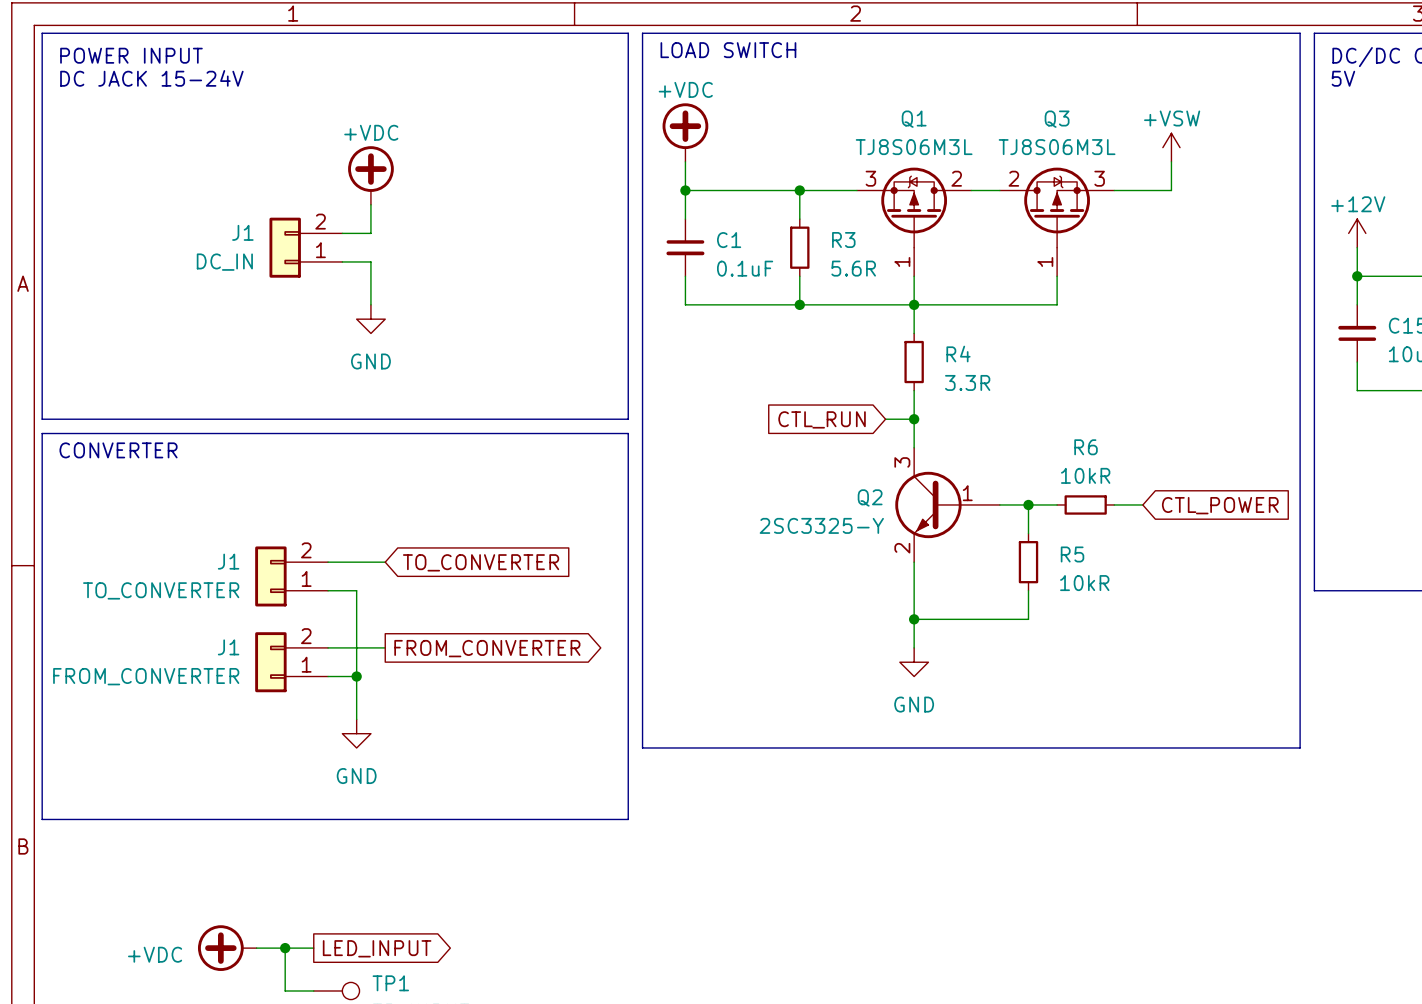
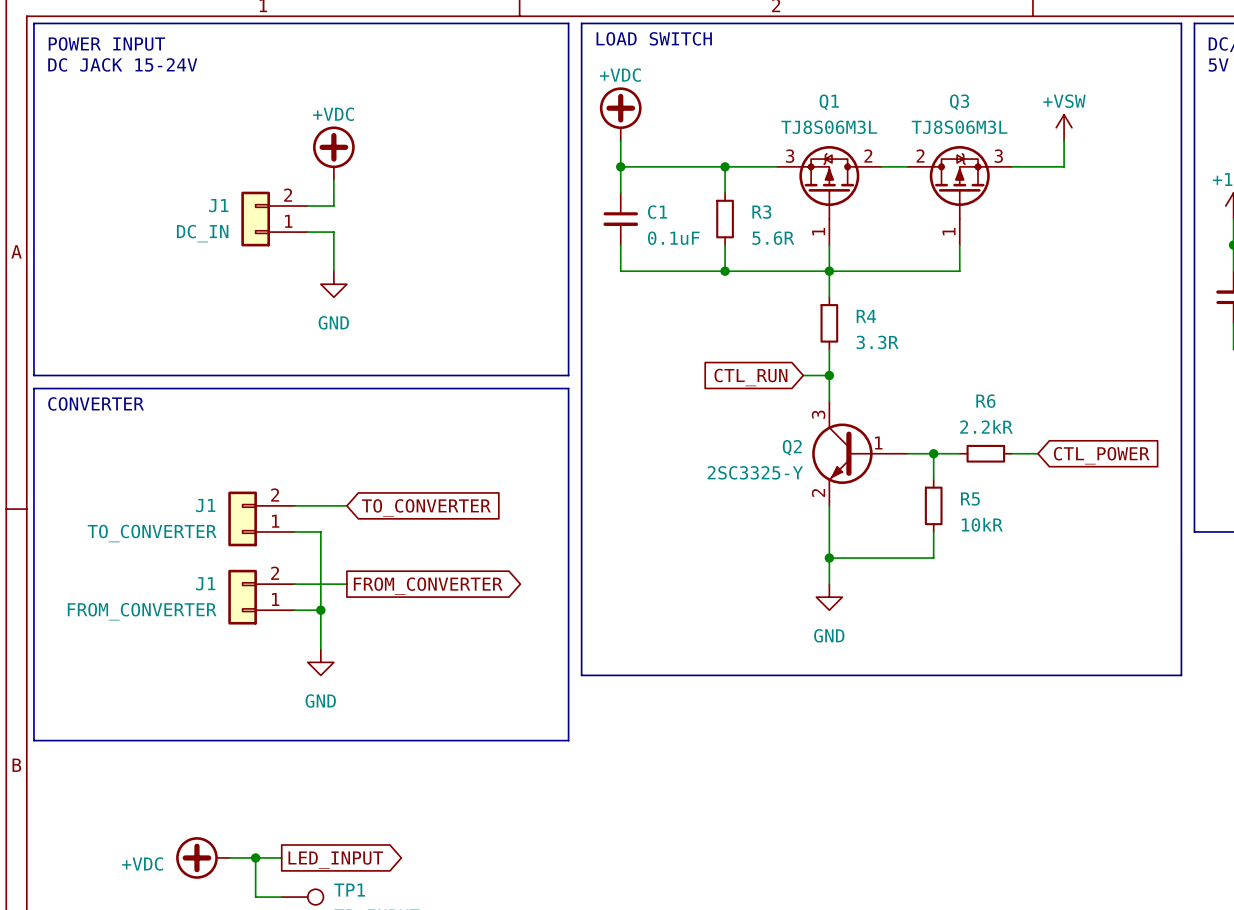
R6 value: 10kR (1085, 475) -> 2.2kR (986, 426)

